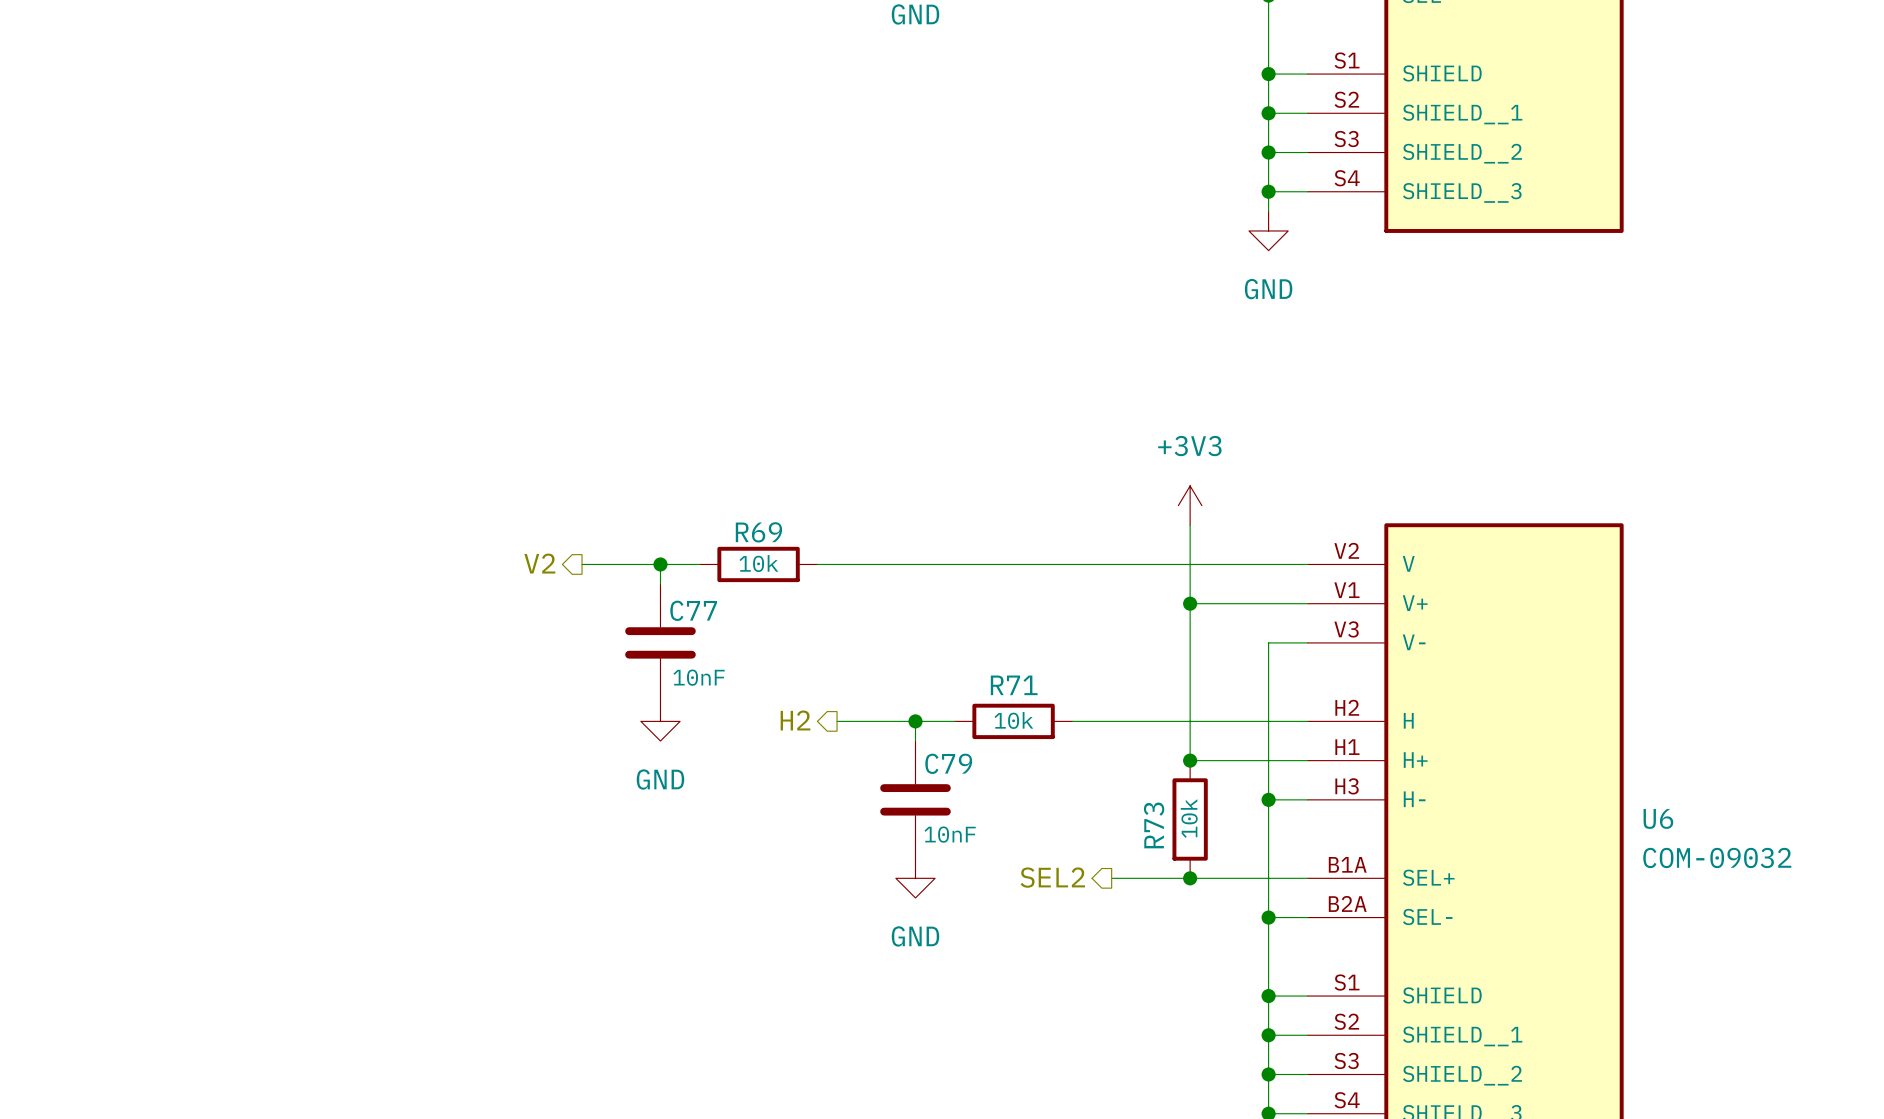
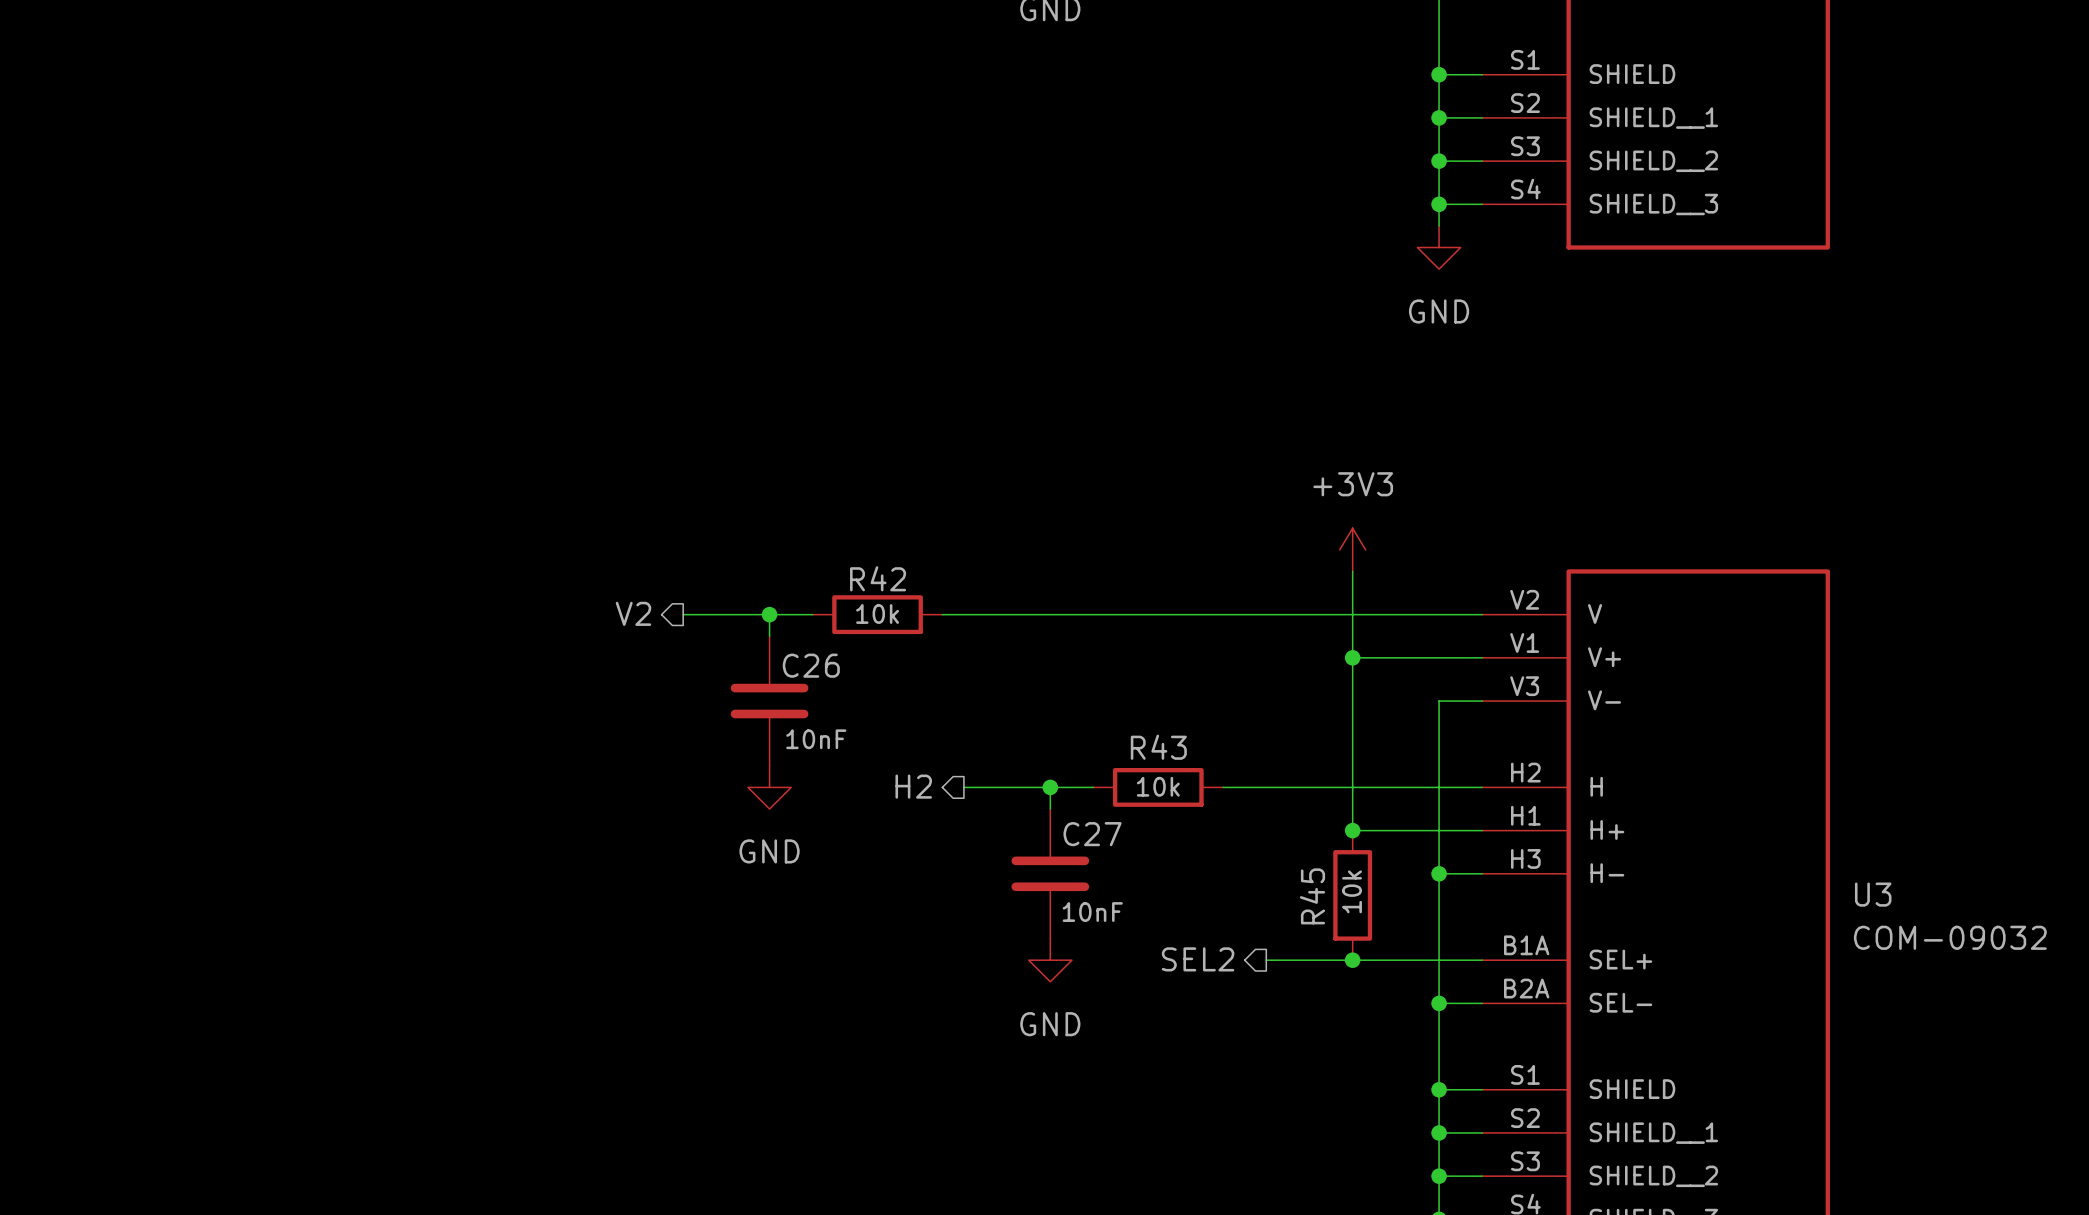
R69 name: R69 (758, 532) -> R42 (878, 578)
C77 name: C77 (693, 610) -> C26 (811, 665)
R71 name: R71 (1014, 685) -> R43 (1158, 747)
C79 name: C79 (948, 763) -> C27 (1092, 834)
U6 name: U6 (1658, 818) -> U3 (1873, 894)
R73 name: R73 (1154, 825) -> R45 (1312, 896)

